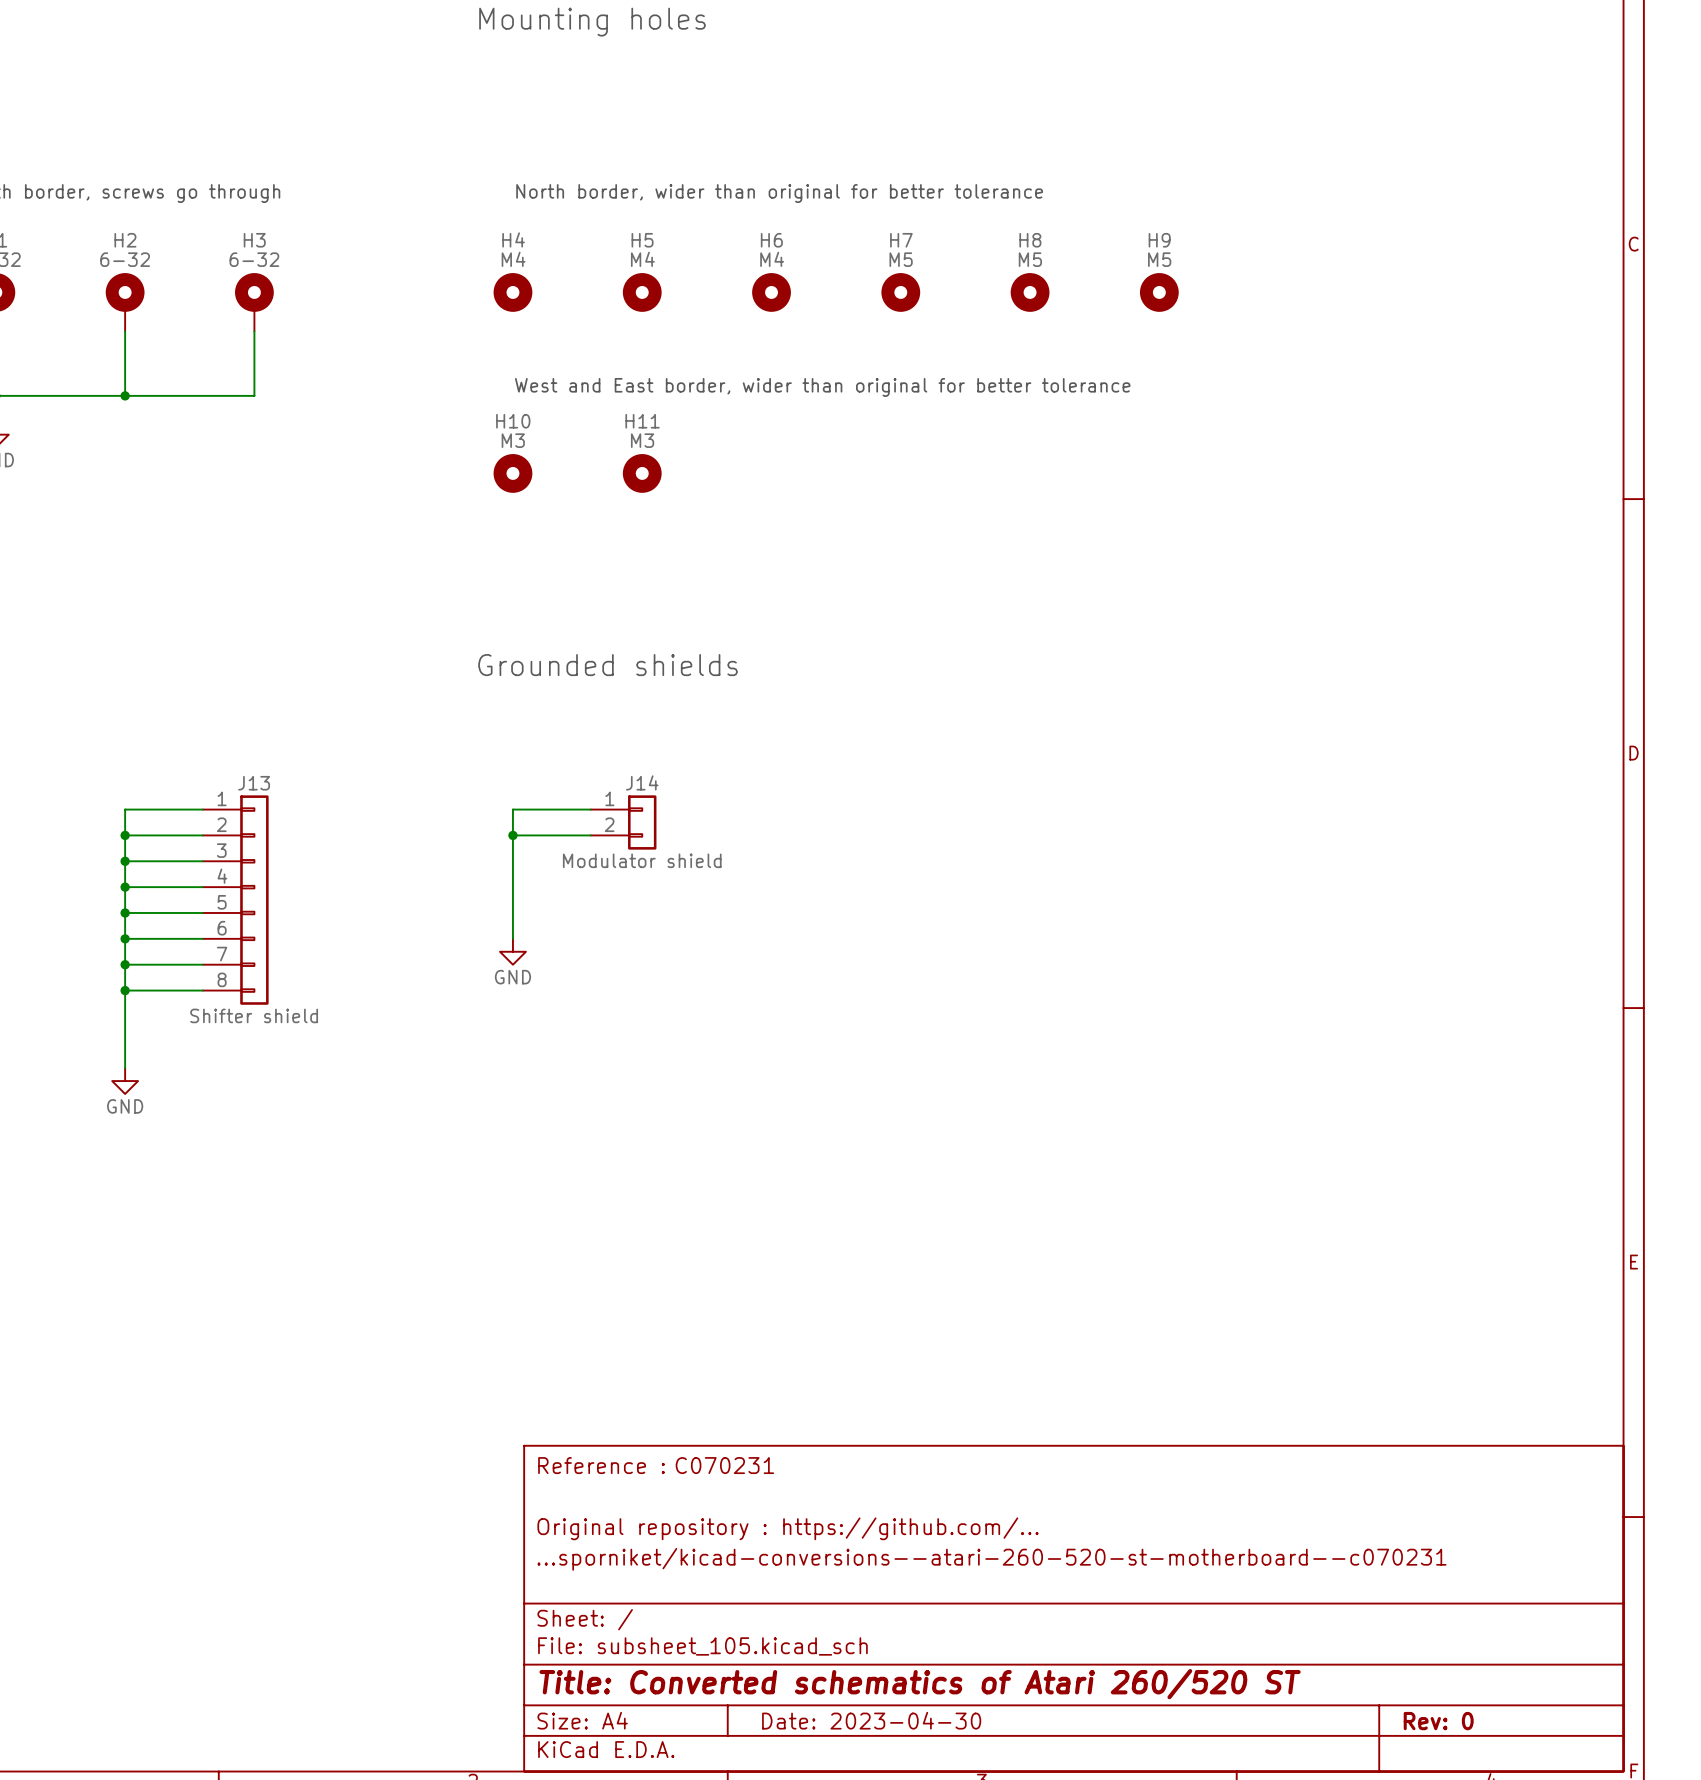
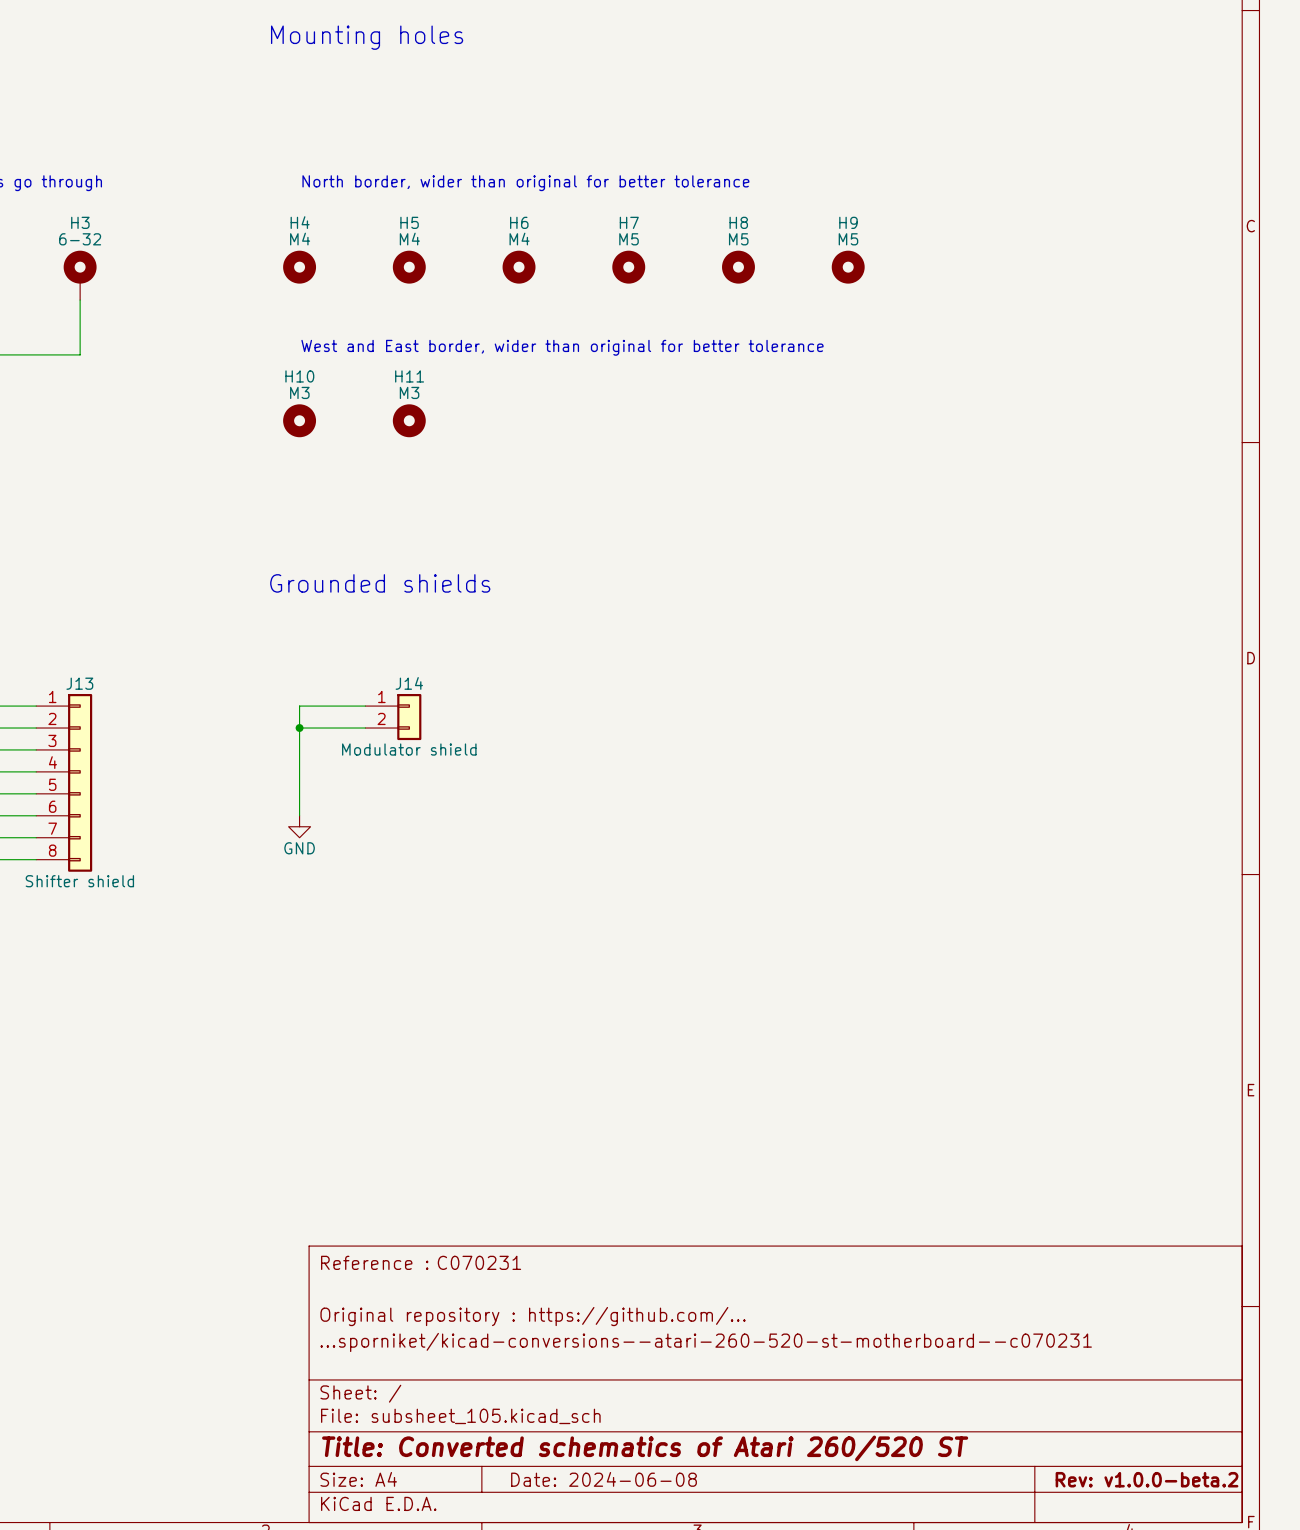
title block: Date: 2023-04-30 (871, 1720) -> Date: 2024-06-08 (604, 1479)
title block: Rev: 0 (1438, 1721) -> Rev: v1.0.0-beta.2 (1147, 1479)

